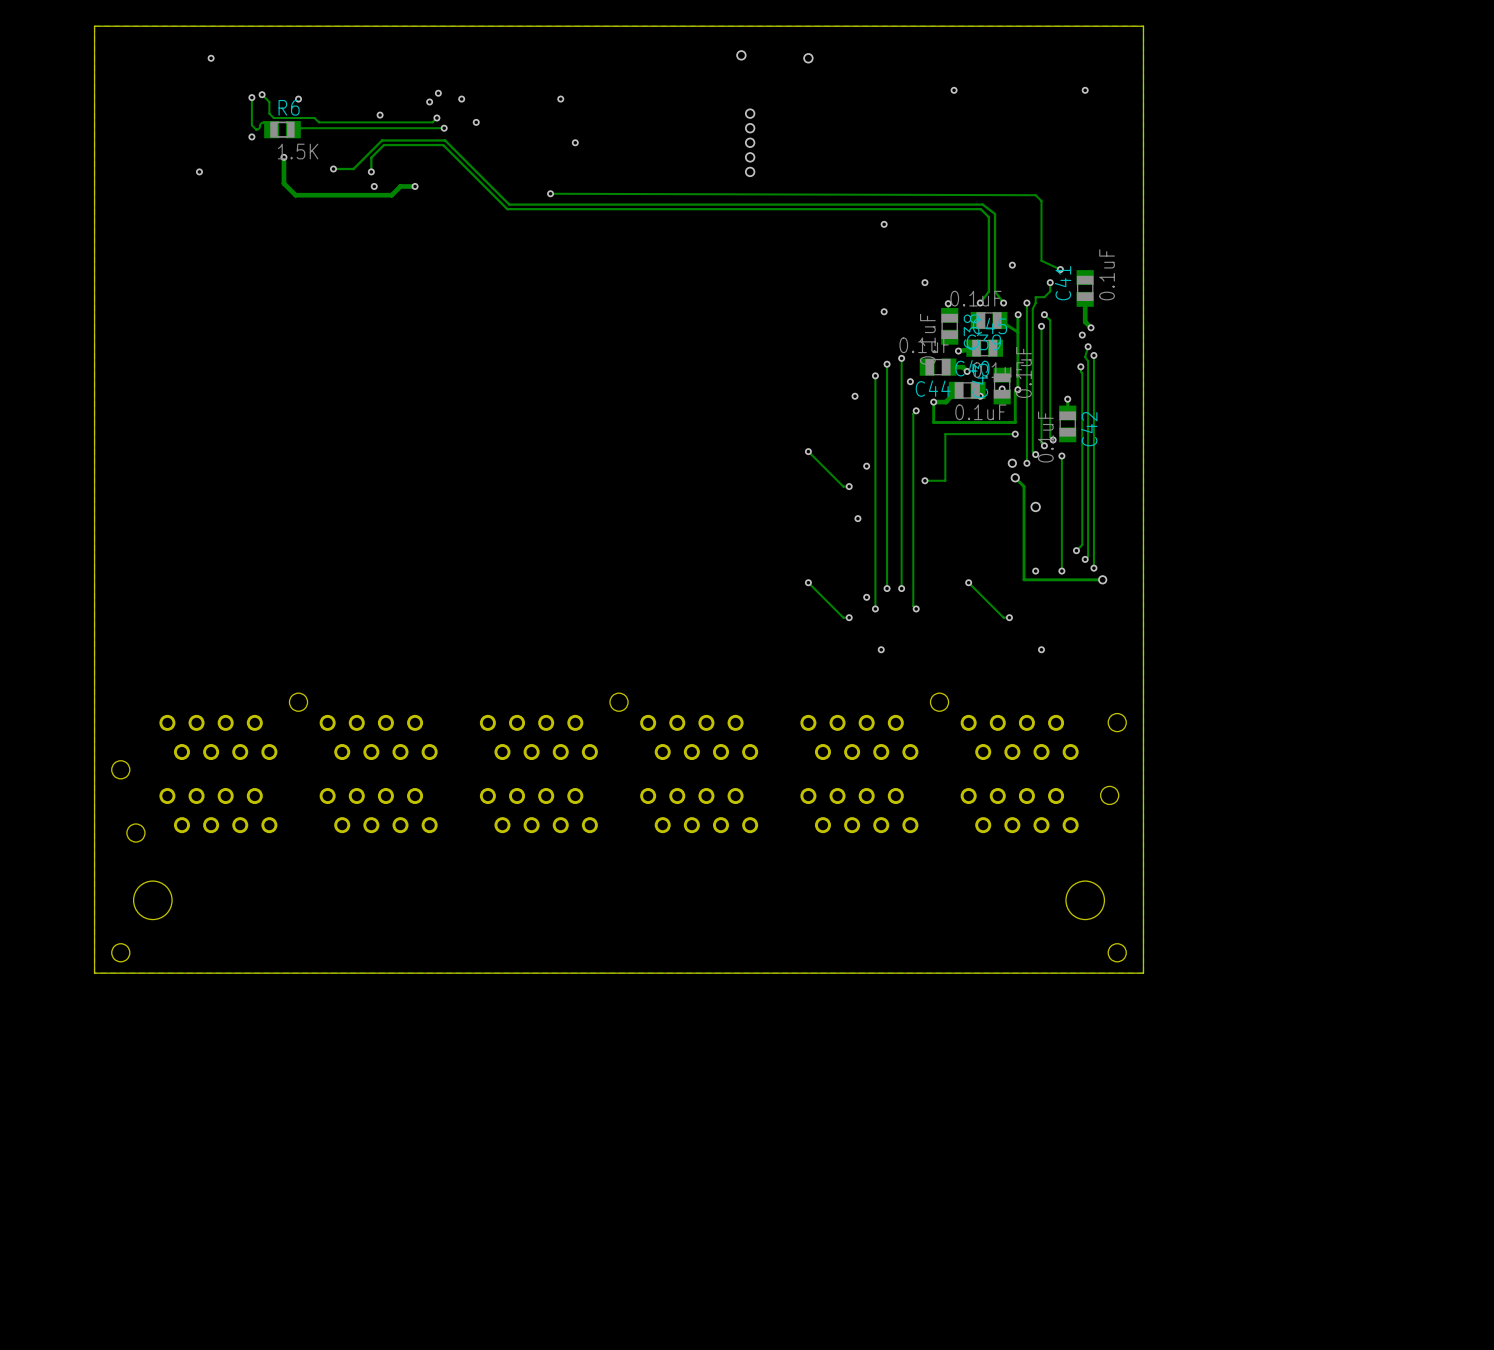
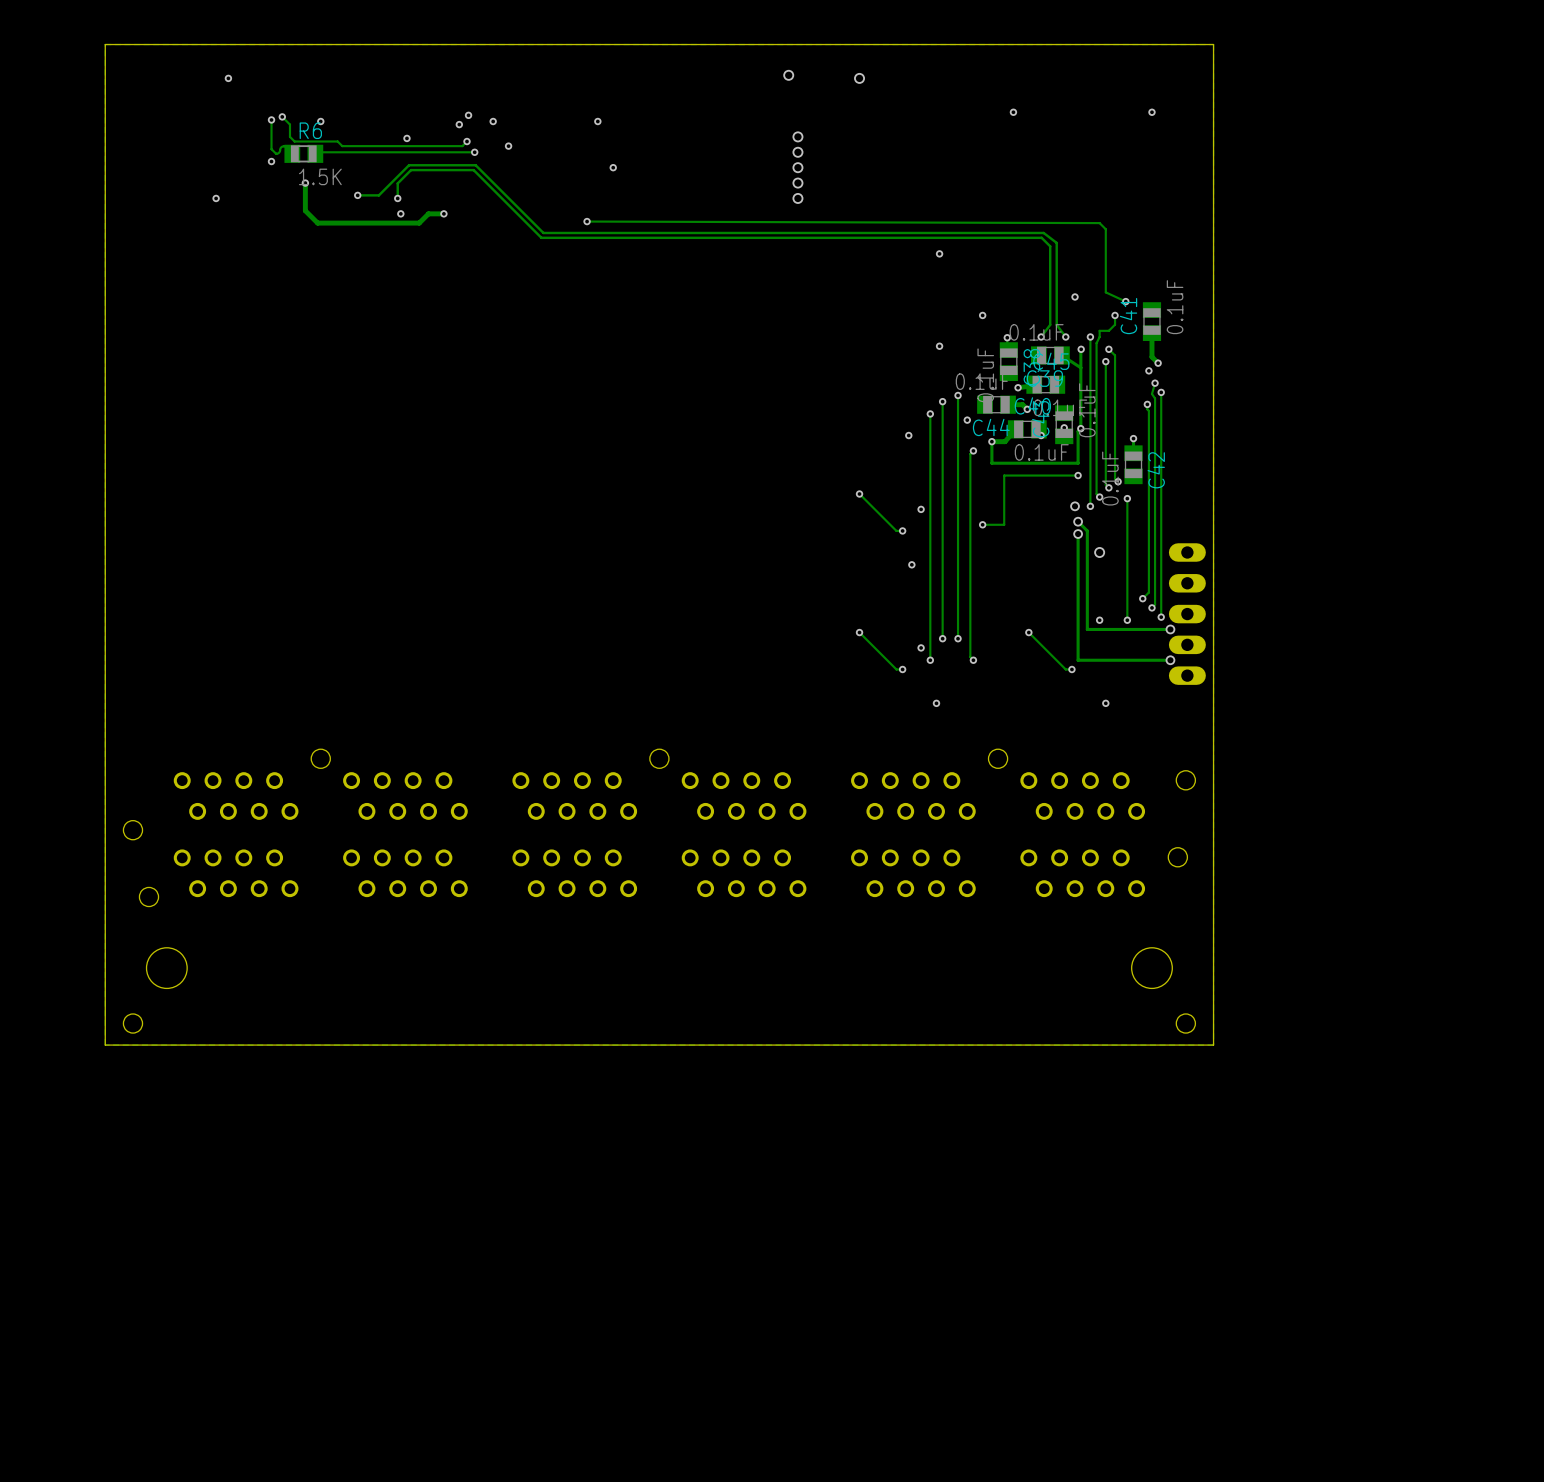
track: none -> (1078, 534) (1078, 660) (1170, 660)
via: none -> (1078, 534)
part: none -> (1187, 614)
via: none -> (1170, 660)

